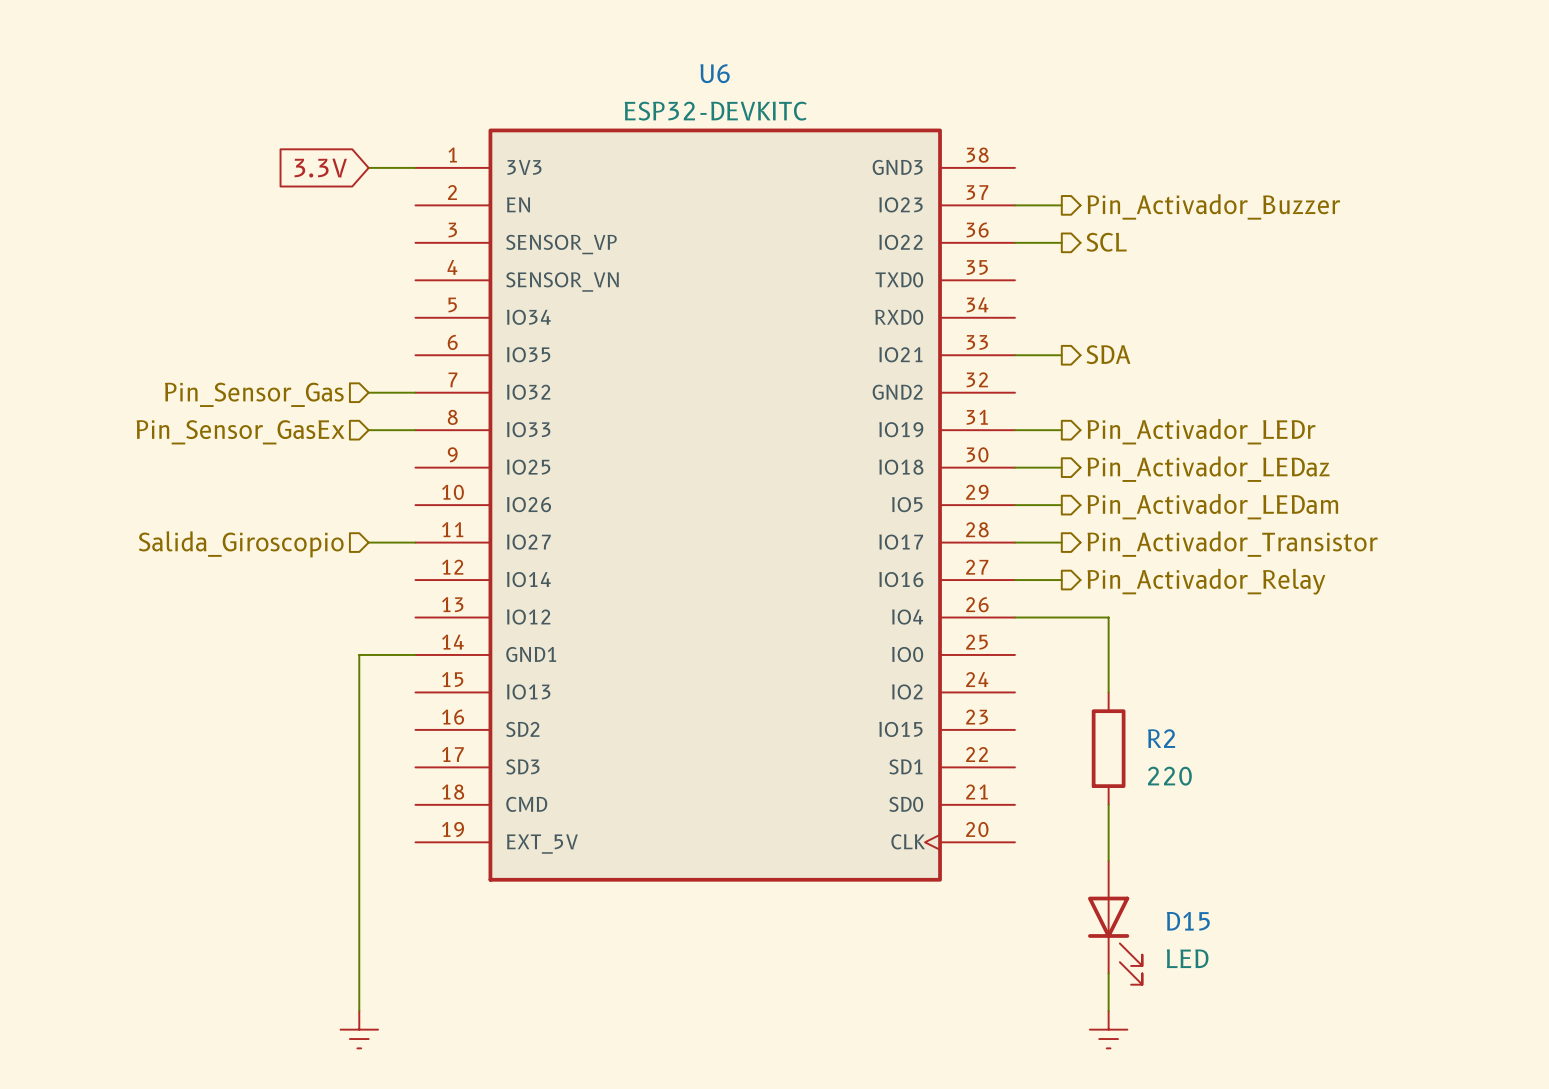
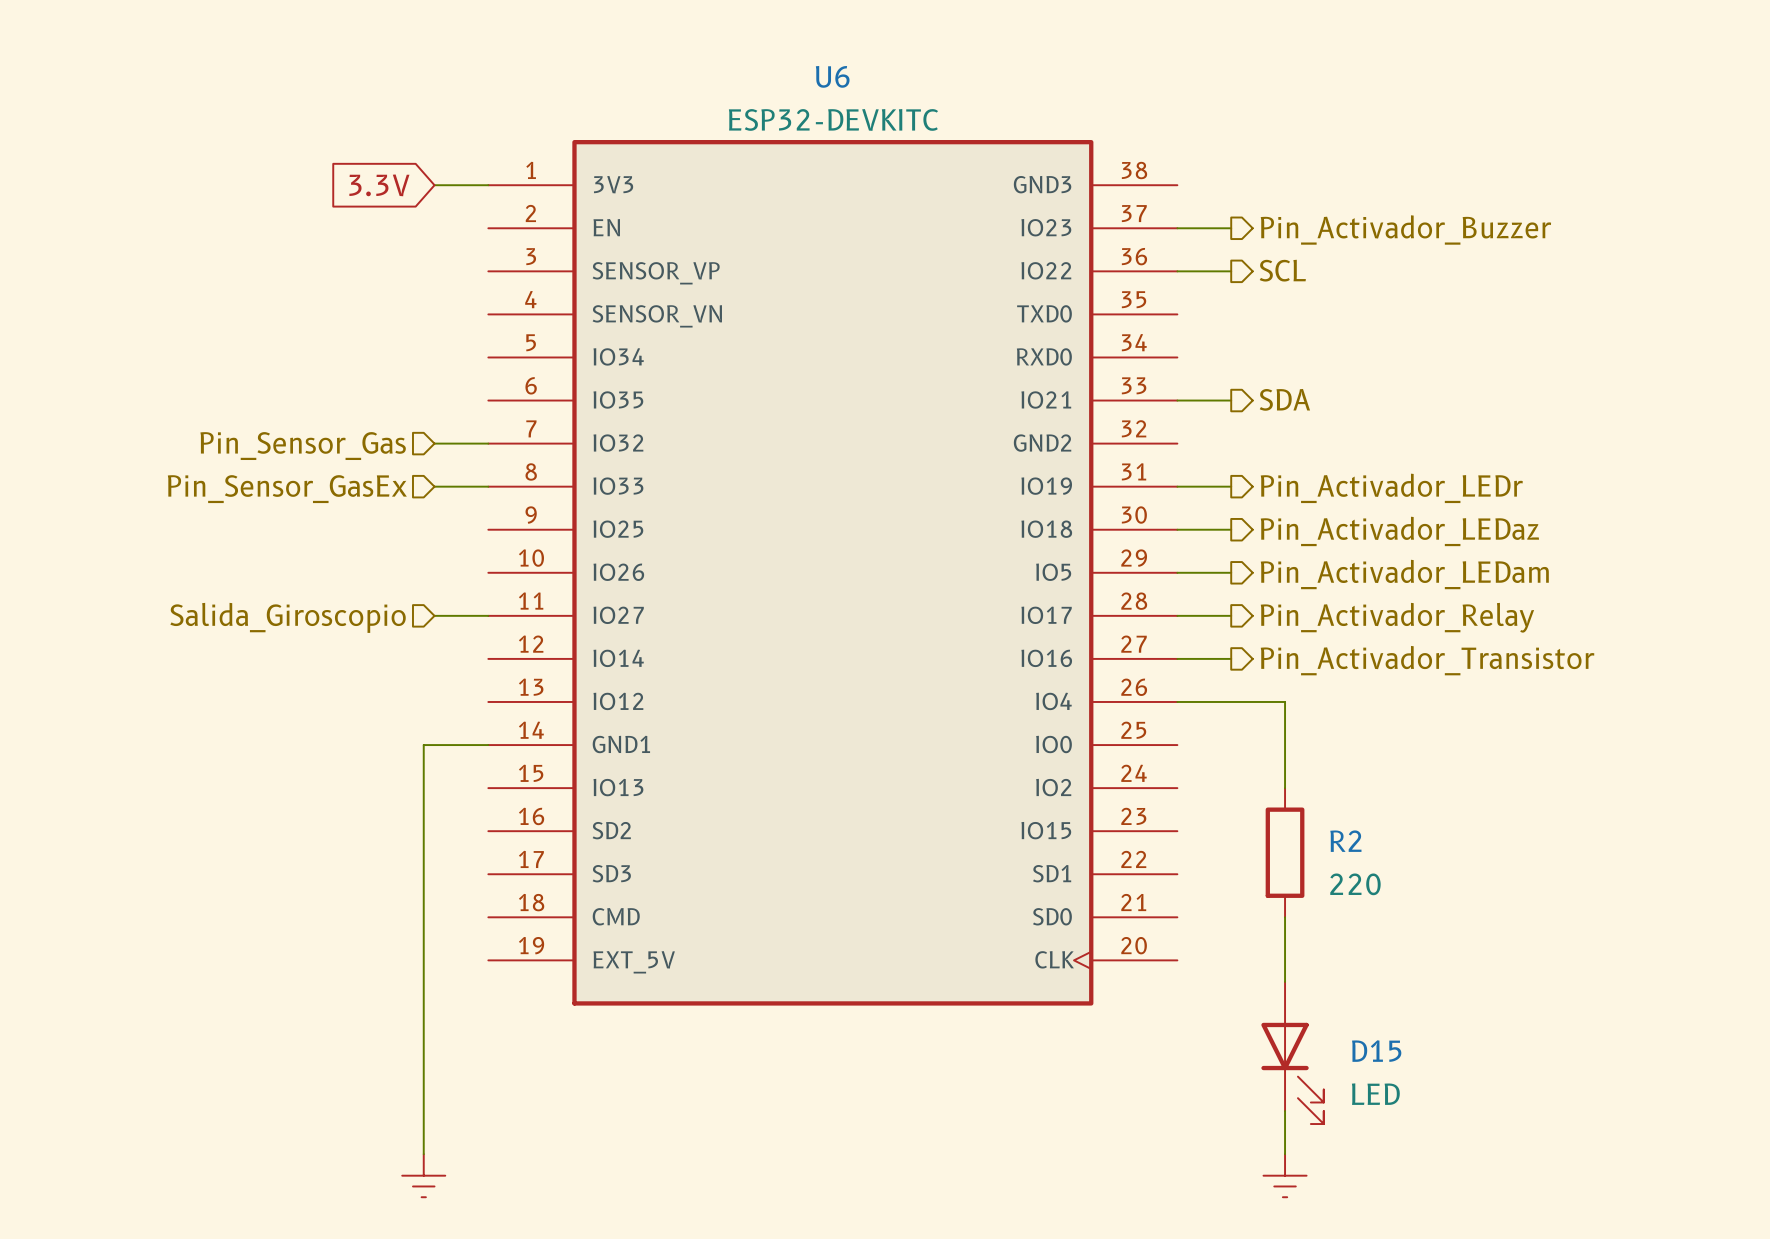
hierarchical label: Pin_Activador_Transistor (1232, 544) -> Pin_Activador_Relay (1397, 617)
hierarchical label: Pin_Activador_Relay (1206, 581) -> Pin_Activador_Transistor (1427, 660)

